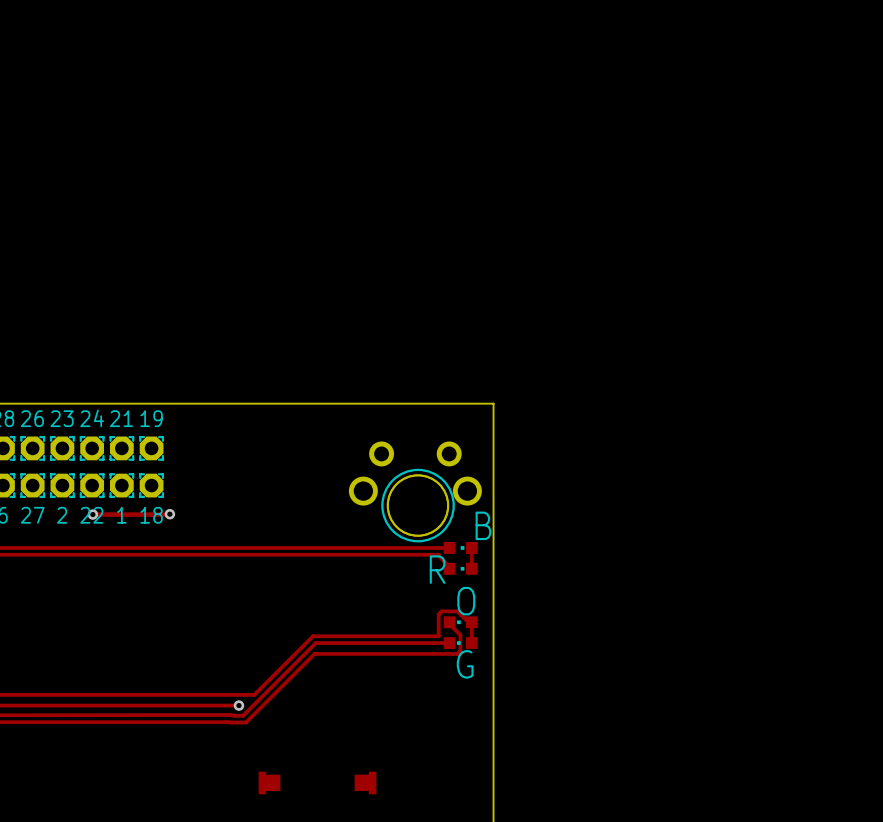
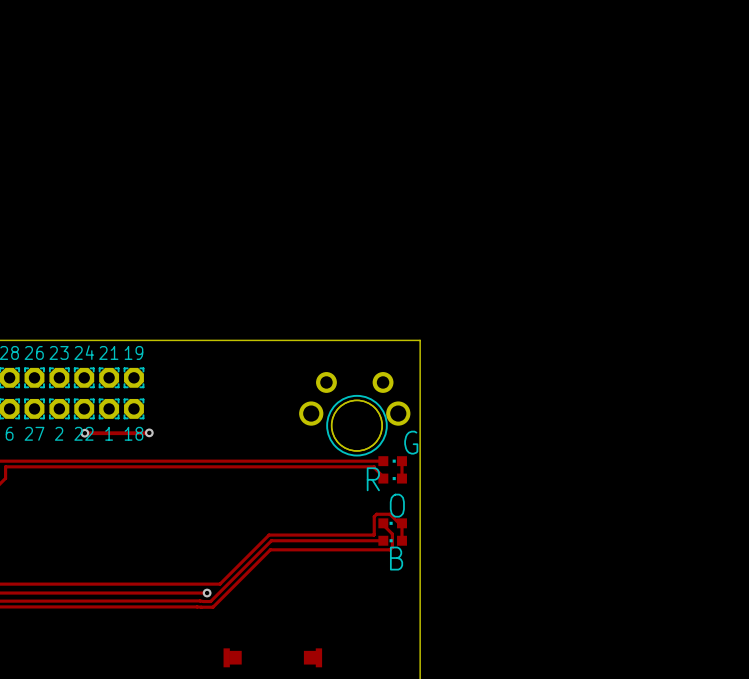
text: B (483, 525) -> G (411, 442)
text: G (465, 664) -> B (396, 558)

